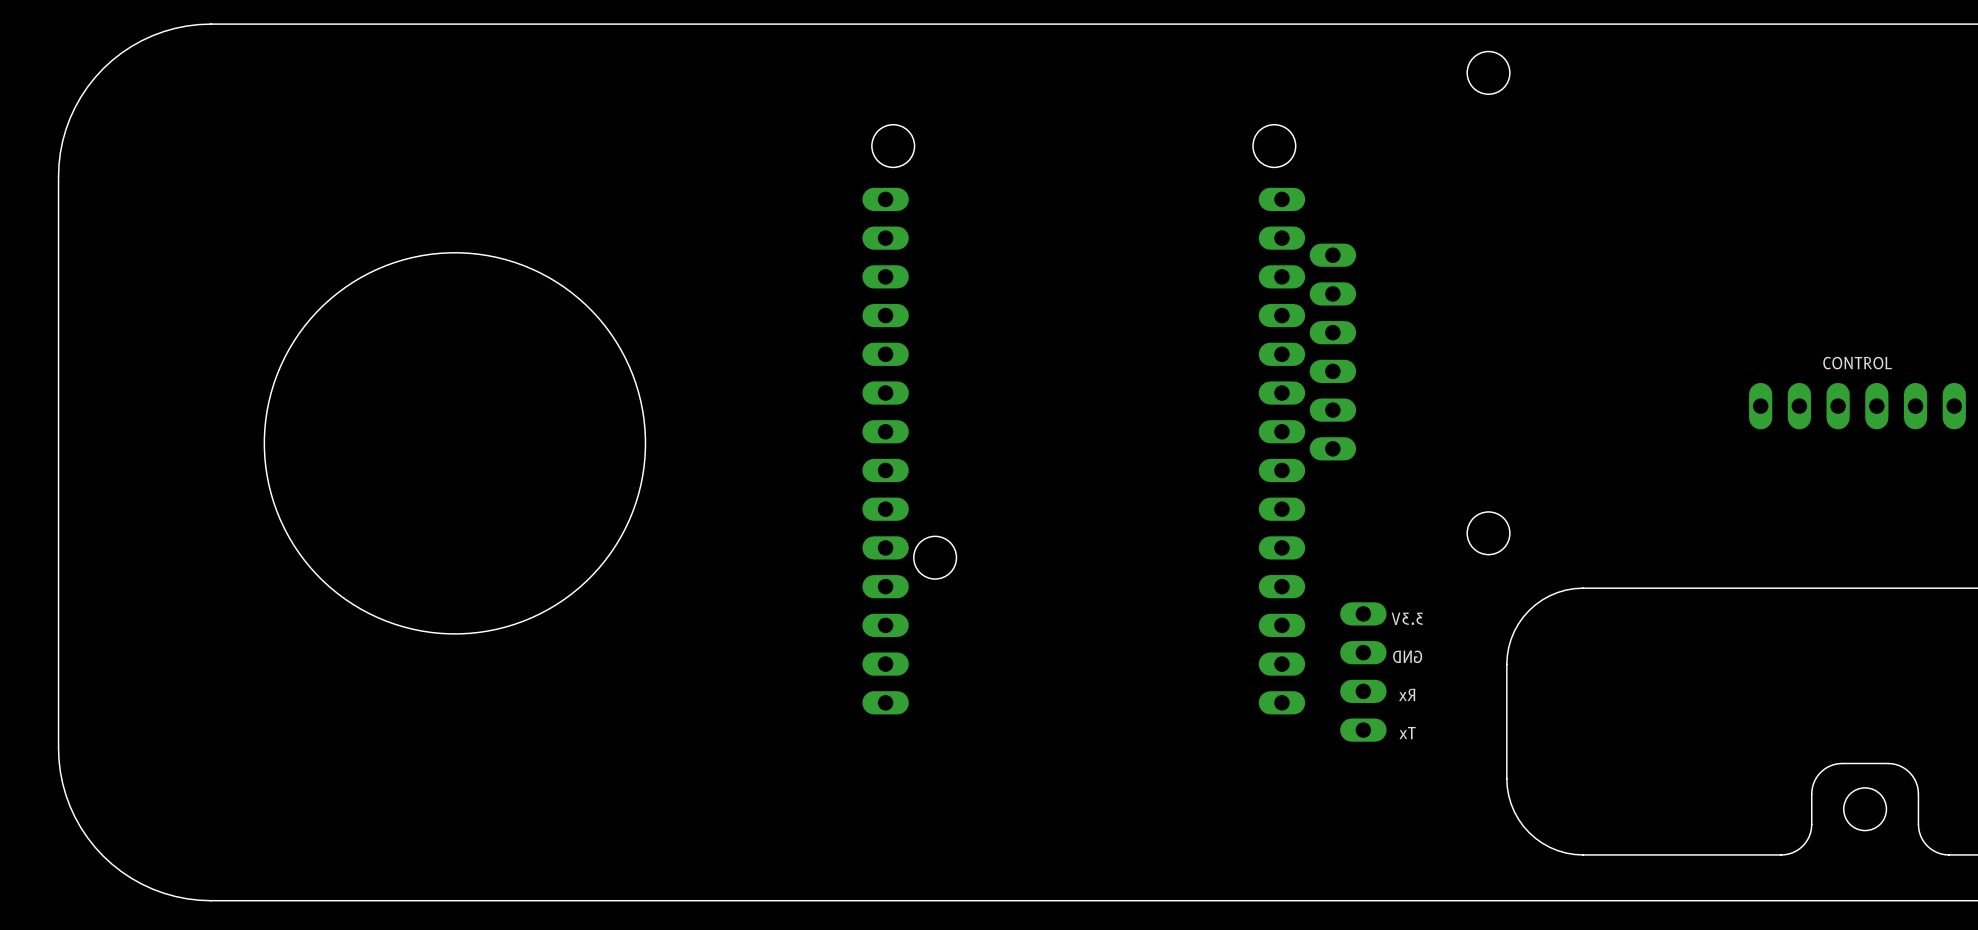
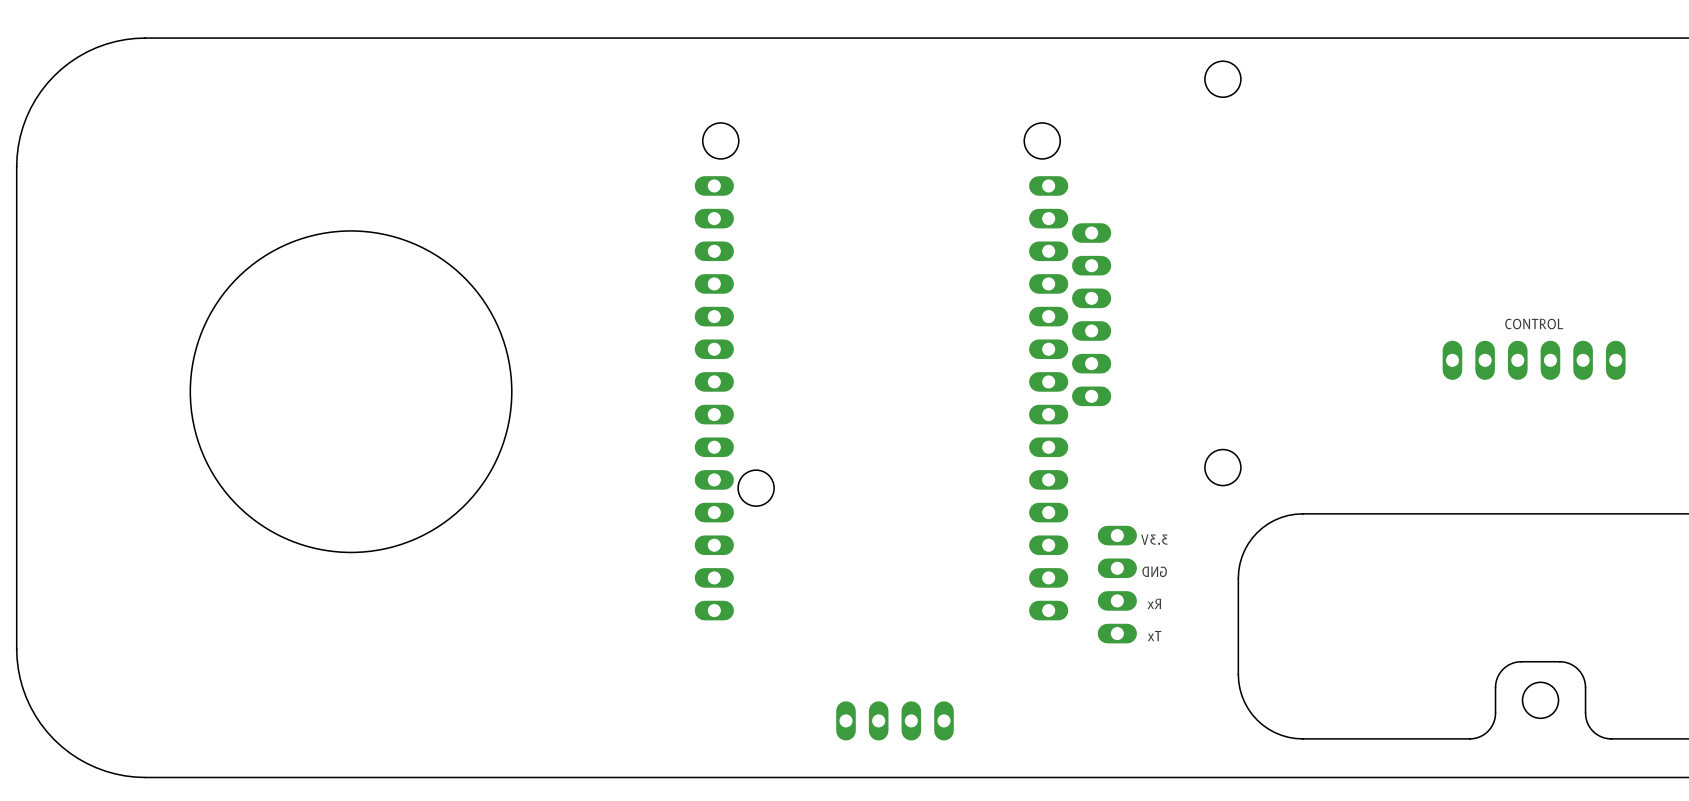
part: none -> (895, 720)

